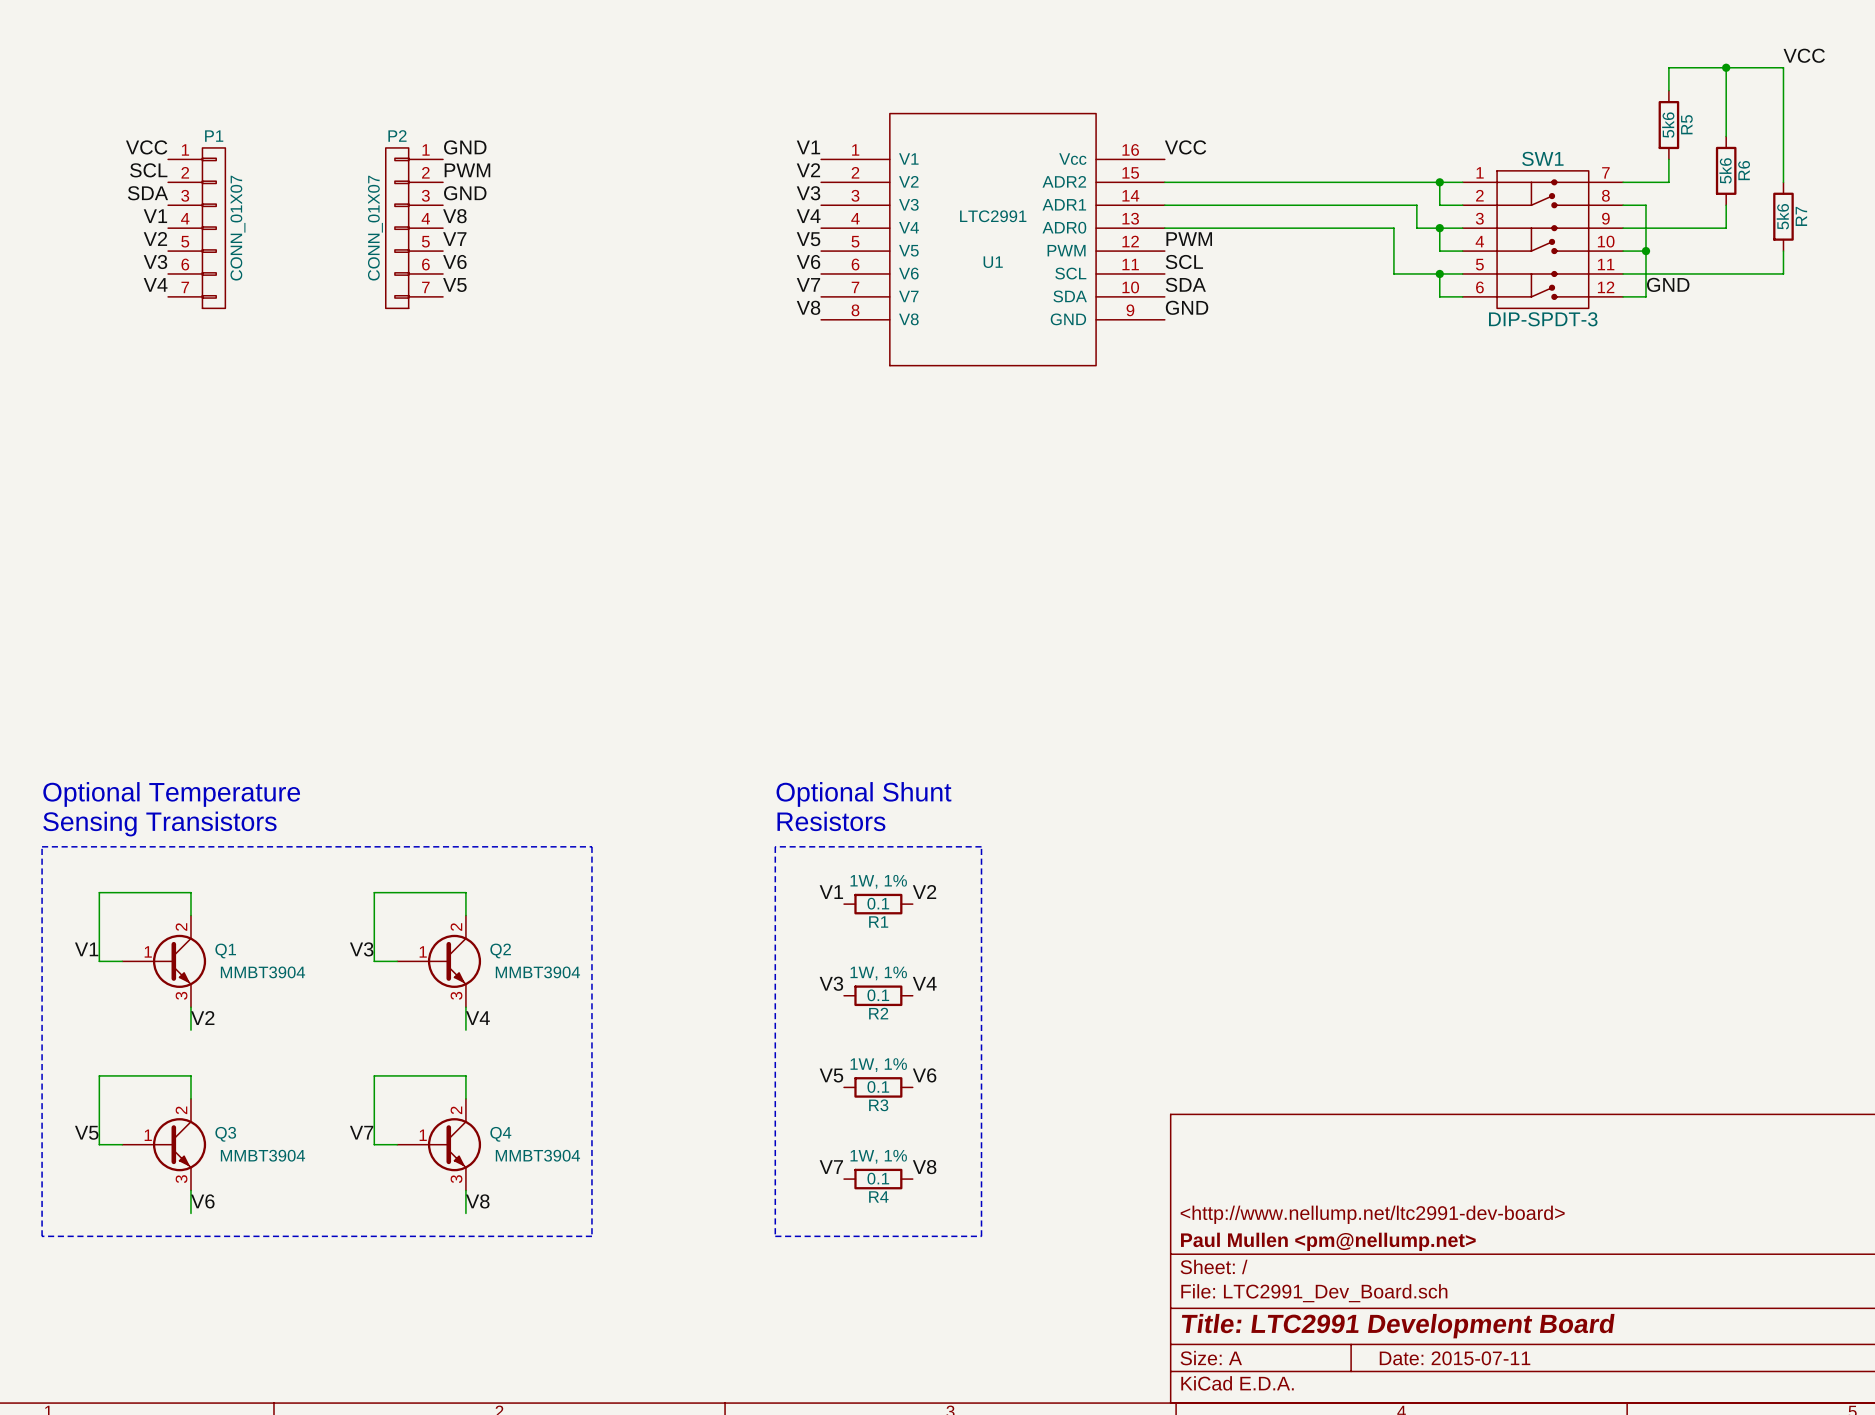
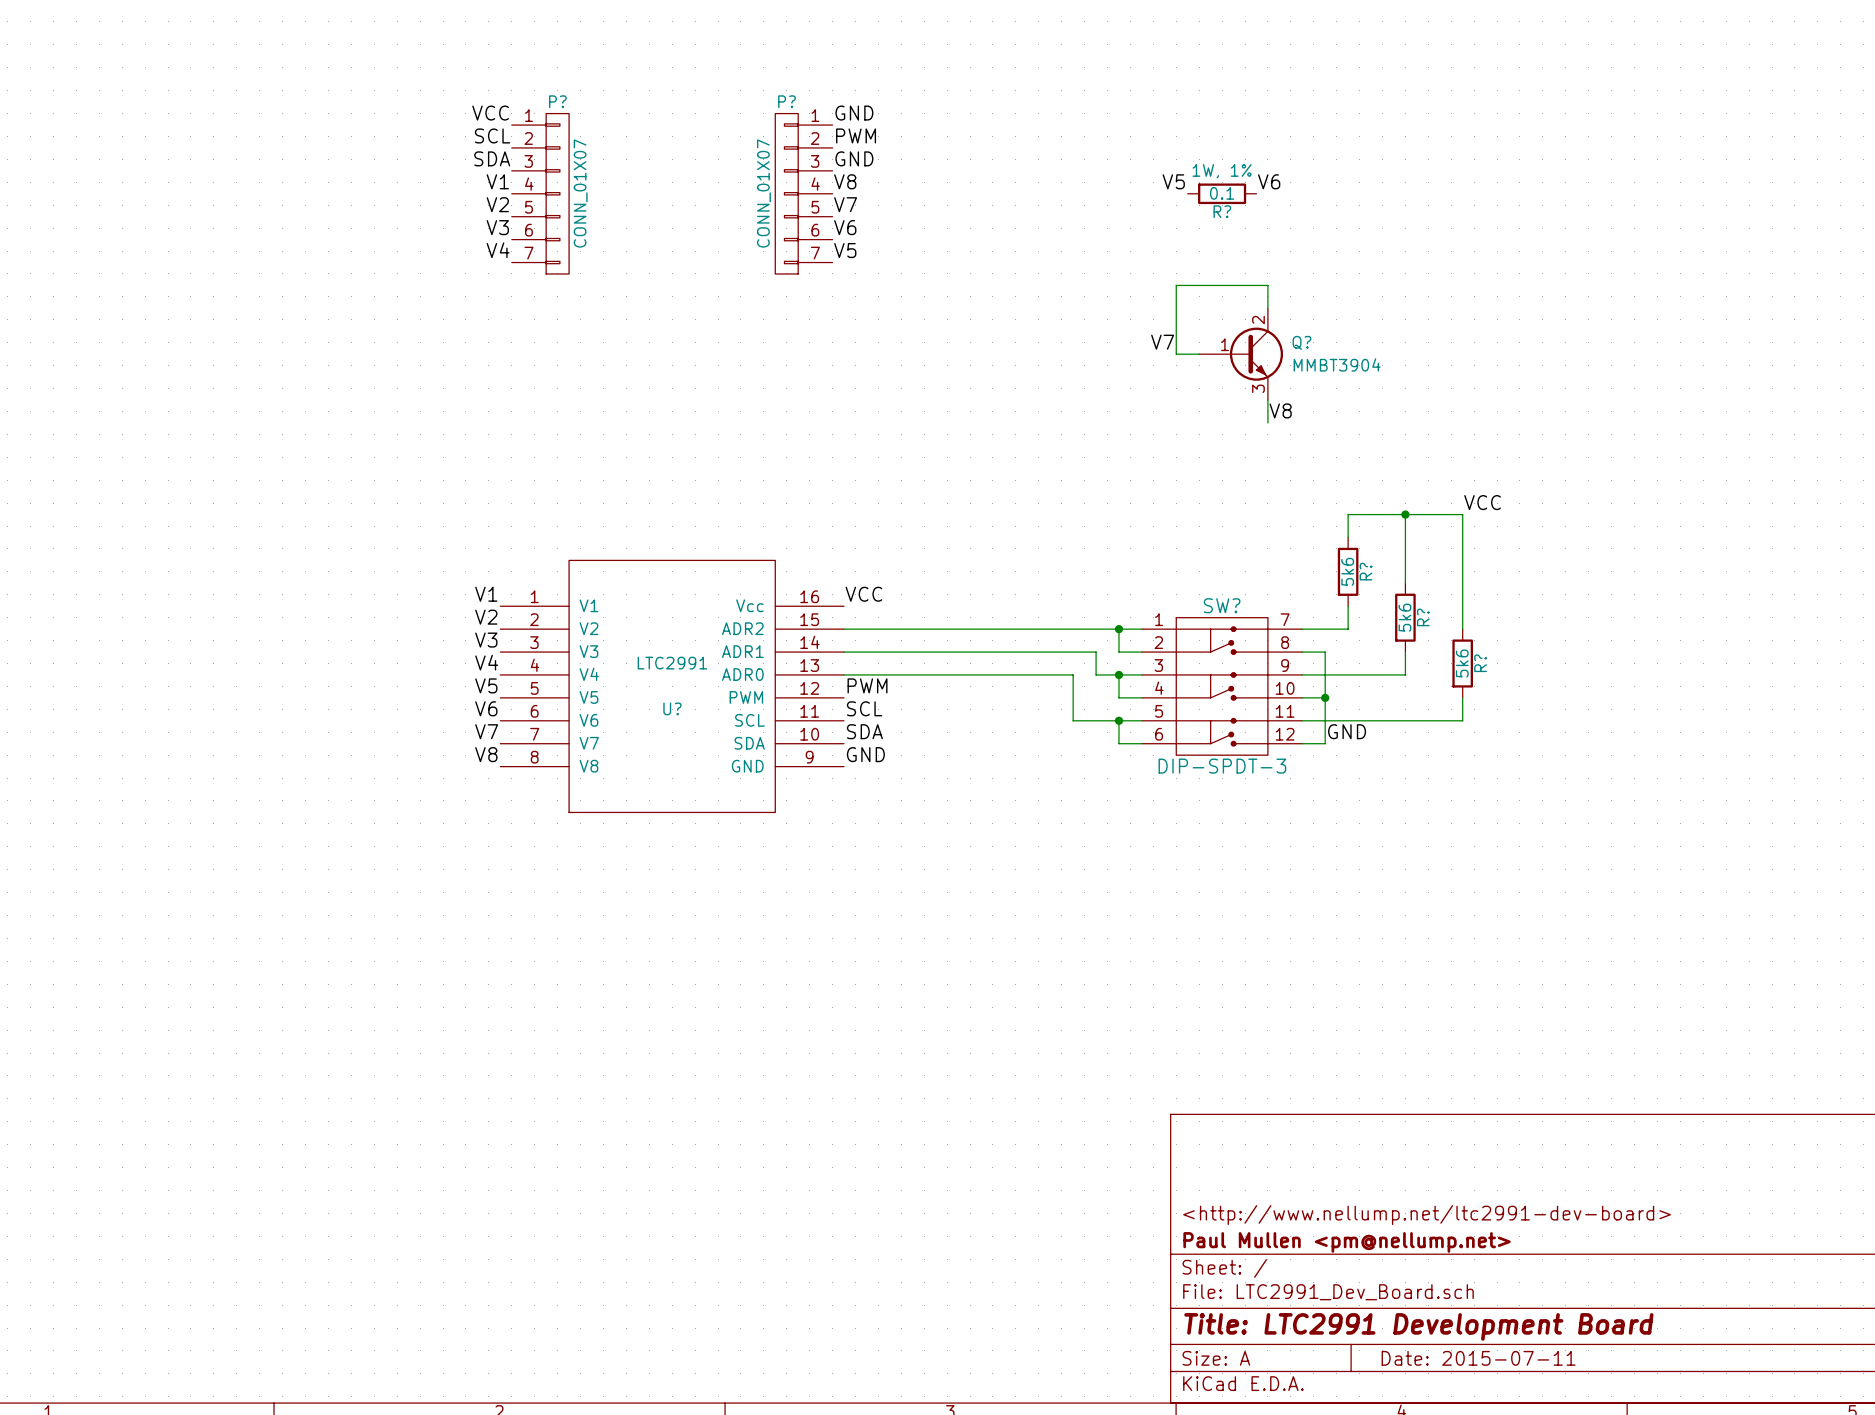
label: VCC (1804, 55) -> none
wire: (1726, 67) (1726, 136) -> none
junction: (1726, 67) -> none
wire: (1668, 90) (1668, 67) (1783, 67) (1783, 182) -> none
label: none -> VCC (490, 113)
label: none -> GND (854, 113)
R5: 5k6 (1668, 125) -> none
label: none -> SCL (492, 135)
label: none -> PWM (856, 135)
label: VCC (146, 147) -> none
label: GND (465, 147) -> none
label: V1 (808, 147) -> none
label: VCC (1185, 147) -> none
label: none -> SDA (492, 158)
label: none -> GND (854, 158)
wire: (1668, 159) (1668, 182) (1623, 182) -> none
label: SCL (148, 170) -> none
label: PWM (467, 170) -> none
label: V2 (808, 170) -> none
R6: 5k6 (1726, 170) -> none
label: none -> V1 (497, 181)
label: none -> V5 (1173, 181)
label: none -> V6 (1269, 181)
wire: (1164, 182) (1462, 182) -> none
wire: (1439, 182) (1439, 205) (1462, 205) -> none
junction: (1439, 182) -> none
label: SDA (147, 193) -> none
label: GND (465, 193) -> none
P?: none -> CONN_01X07 (540, 193)
P?: none -> CONN_01X07 (803, 193)
label: V3 (808, 193) -> none
R?: none -> 0.1 (1222, 193)
label: none -> V2 (497, 204)
wire: (1164, 205) (1416, 205) (1416, 228) (1462, 228) -> none
wire: (1623, 205) (1645, 205) (1645, 296) (1623, 296) -> none
wire: (1726, 205) (1726, 228) (1623, 228) -> none
label: V1 (155, 216) -> none
label: V8 (454, 216) -> none
label: V4 (808, 216) -> none
R7: 5k6 (1783, 216) -> none
label: none -> V3 (497, 227)
P1: CONN_01X07 (196, 228) -> none
P2: CONN_01X07 (414, 228) -> none
wire: (1164, 228) (1393, 228) (1393, 273) (1462, 273) -> none
wire: (1439, 228) (1439, 251) (1462, 251) -> none
junction: (1439, 228) -> none
label: V2 (155, 238) -> none
label: V7 (454, 239) -> none
label position: V5 (808, 239) -> V5 (845, 250)
U1: LTC2991 (992, 239) -> none
label: PWM (1189, 239) -> none
SW1: DIP-SPDT-3 (1542, 239) -> none
label: none -> V4 (498, 250)
wire: (1623, 251) (1645, 251) -> none
junction: (1645, 251) -> none
wire: (1783, 251) (1783, 273) (1623, 273) -> none
label: V3 (155, 261) -> none
label: V6 (454, 261) -> none
label position: V6 (808, 261) -> V6 (845, 227)
label: SCL (1184, 261) -> none
wire: (1439, 273) (1439, 296) (1462, 296) -> none
junction: (1439, 273) -> none
label: V4 (155, 284) -> none
label position: V7 (808, 284) -> V7 (845, 204)
label: SDA (1185, 284) -> none
label: GND (1668, 284) -> none
label: V5 (454, 285) -> none
label position: V8 (808, 307) -> V8 (845, 181)
label: GND (1187, 307) -> none
wire: none -> (1267, 308) (1267, 285) (1176, 285) (1176, 354) (1199, 354)
label: none -> V7 (1162, 342)
Q?: none -> MMBT3904 (1241, 354)
wire: none -> (1267, 400) (1267, 422)
label: none -> V8 (1280, 410)
label: none -> VCC (1482, 502)
wire: none -> (1405, 514) (1405, 583)
junction: none -> (1405, 514)
wire: none -> (1348, 537) (1348, 514) (1462, 514) (1462, 629)
R?: none -> 5k6 (1348, 571)
label: none -> V1 (486, 594)
label: none -> VCC (863, 594)
wire: none -> (1348, 606) (1348, 629) (1302, 629)
label: none -> V2 (486, 617)
R?: none -> 5k6 (1405, 617)
wire: none -> (844, 629) (1141, 629)
wire: none -> (1118, 629) (1118, 652) (1141, 652)
junction: none -> (1118, 629)
label: none -> V3 (486, 640)
wire: none -> (844, 652) (1096, 652) (1096, 674) (1141, 674)
wire: none -> (1302, 652) (1325, 652) (1325, 743) (1302, 743)
wire: none -> (1405, 652) (1405, 674) (1302, 674)
label: none -> V4 (486, 662)
R?: none -> 5k6 (1462, 663)
wire: none -> (844, 674) (1073, 674) (1073, 720) (1141, 720)
wire: none -> (1118, 674) (1118, 697) (1141, 697)
junction: none -> (1118, 674)
label: none -> V5 (486, 685)
label: none -> PWM (867, 685)
U?: none -> LTC2991 (672, 686)
SW?: none -> DIP-SPDT-3 (1222, 686)
wire: none -> (1302, 697) (1325, 697)
junction: none -> (1325, 697)
wire: none -> (1462, 697) (1462, 720) (1302, 720)
label: none -> V6 (486, 708)
label: none -> SCL (864, 708)
wire: none -> (1118, 720) (1118, 743) (1141, 743)
junction: none -> (1118, 720)
label: none -> V7 (486, 731)
label: none -> SDA (864, 731)
label: none -> GND (1347, 731)
label: none -> V8 (486, 754)
label: none -> GND (865, 754)
text: Optional Temperature (171, 794) -> none
text: Optional Shunt (863, 794) -> none
text: Resistors (831, 821) -> none
text: Sensing Transistors (159, 823) -> none
line: (42, 846) (591, 846) (591, 1236) (42, 1236) (42, 846) -> none
line: (775, 846) (981, 846) (981, 1236) (775, 1236) (775, 846) -> none
label: V1 (831, 892) -> none
label: V2 (924, 892) -> none
R1: 0.1 (878, 904) -> none
wire: (190, 915) (190, 892) (99, 892) (99, 961) (122, 961) -> none
wire: (465, 915) (465, 892) (374, 892) (374, 961) (397, 961) -> none
label: V1 (86, 949) -> none
label: V3 (361, 949) -> none
Q1: MMBT3904 (164, 961) -> none
Q2: MMBT3904 (439, 961) -> none
label: V3 (831, 983) -> none
label: V4 (924, 983) -> none
R2: 0.1 (878, 995) -> none
wire: (190, 1007) (190, 1030) -> none
wire: (465, 1007) (465, 1030) -> none
label: V2 (202, 1018) -> none
label: V4 (477, 1018) -> none
label: V5 (831, 1075) -> none
label: V6 (924, 1075) -> none
R3: 0.1 (878, 1087) -> none
wire: (190, 1098) (190, 1075) (99, 1075) (99, 1144) (122, 1144) -> none
wire: (465, 1098) (465, 1075) (374, 1075) (374, 1144) (397, 1144) -> none
label: V5 (86, 1132) -> none
label: V7 (361, 1132) -> none
Q3: MMBT3904 (164, 1144) -> none
Q4: MMBT3904 (439, 1144) -> none
label: V7 (831, 1167) -> none
label: V8 (924, 1167) -> none
R4: 0.1 (878, 1179) -> none
wire: (190, 1190) (190, 1213) -> none
wire: (465, 1190) (465, 1213) -> none
label: V6 (202, 1201) -> none
label: V8 (477, 1201) -> none

